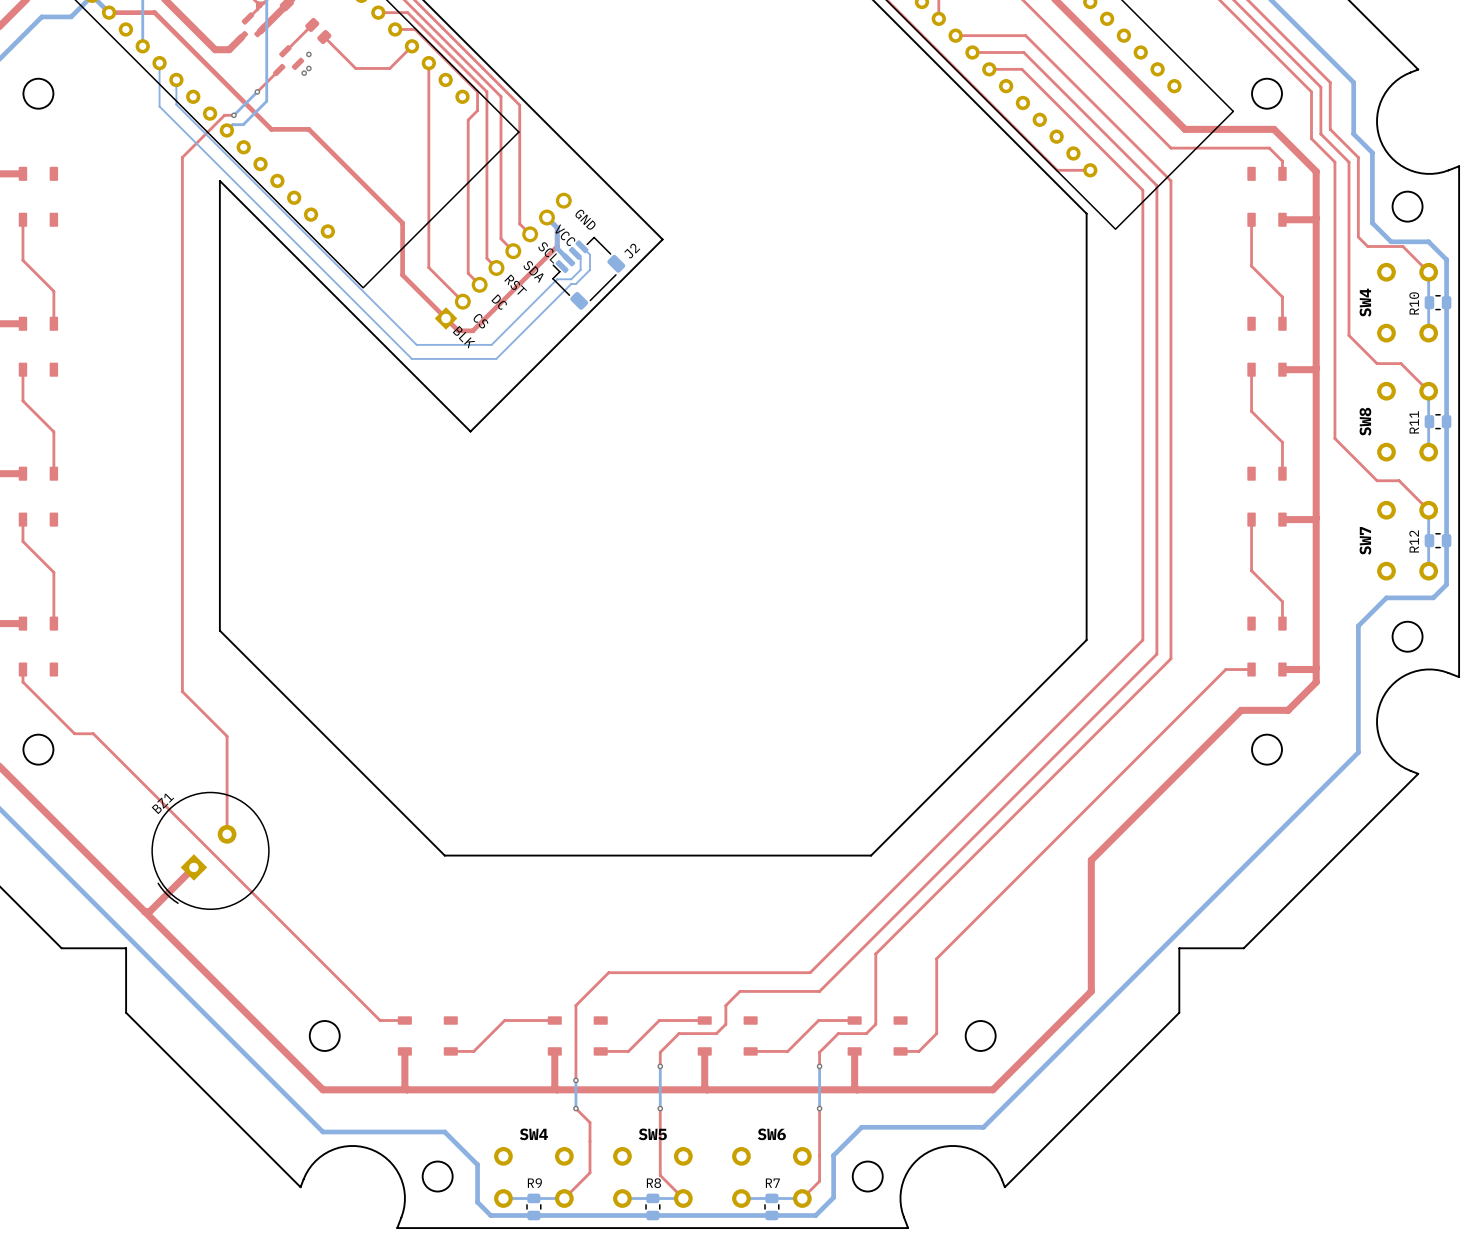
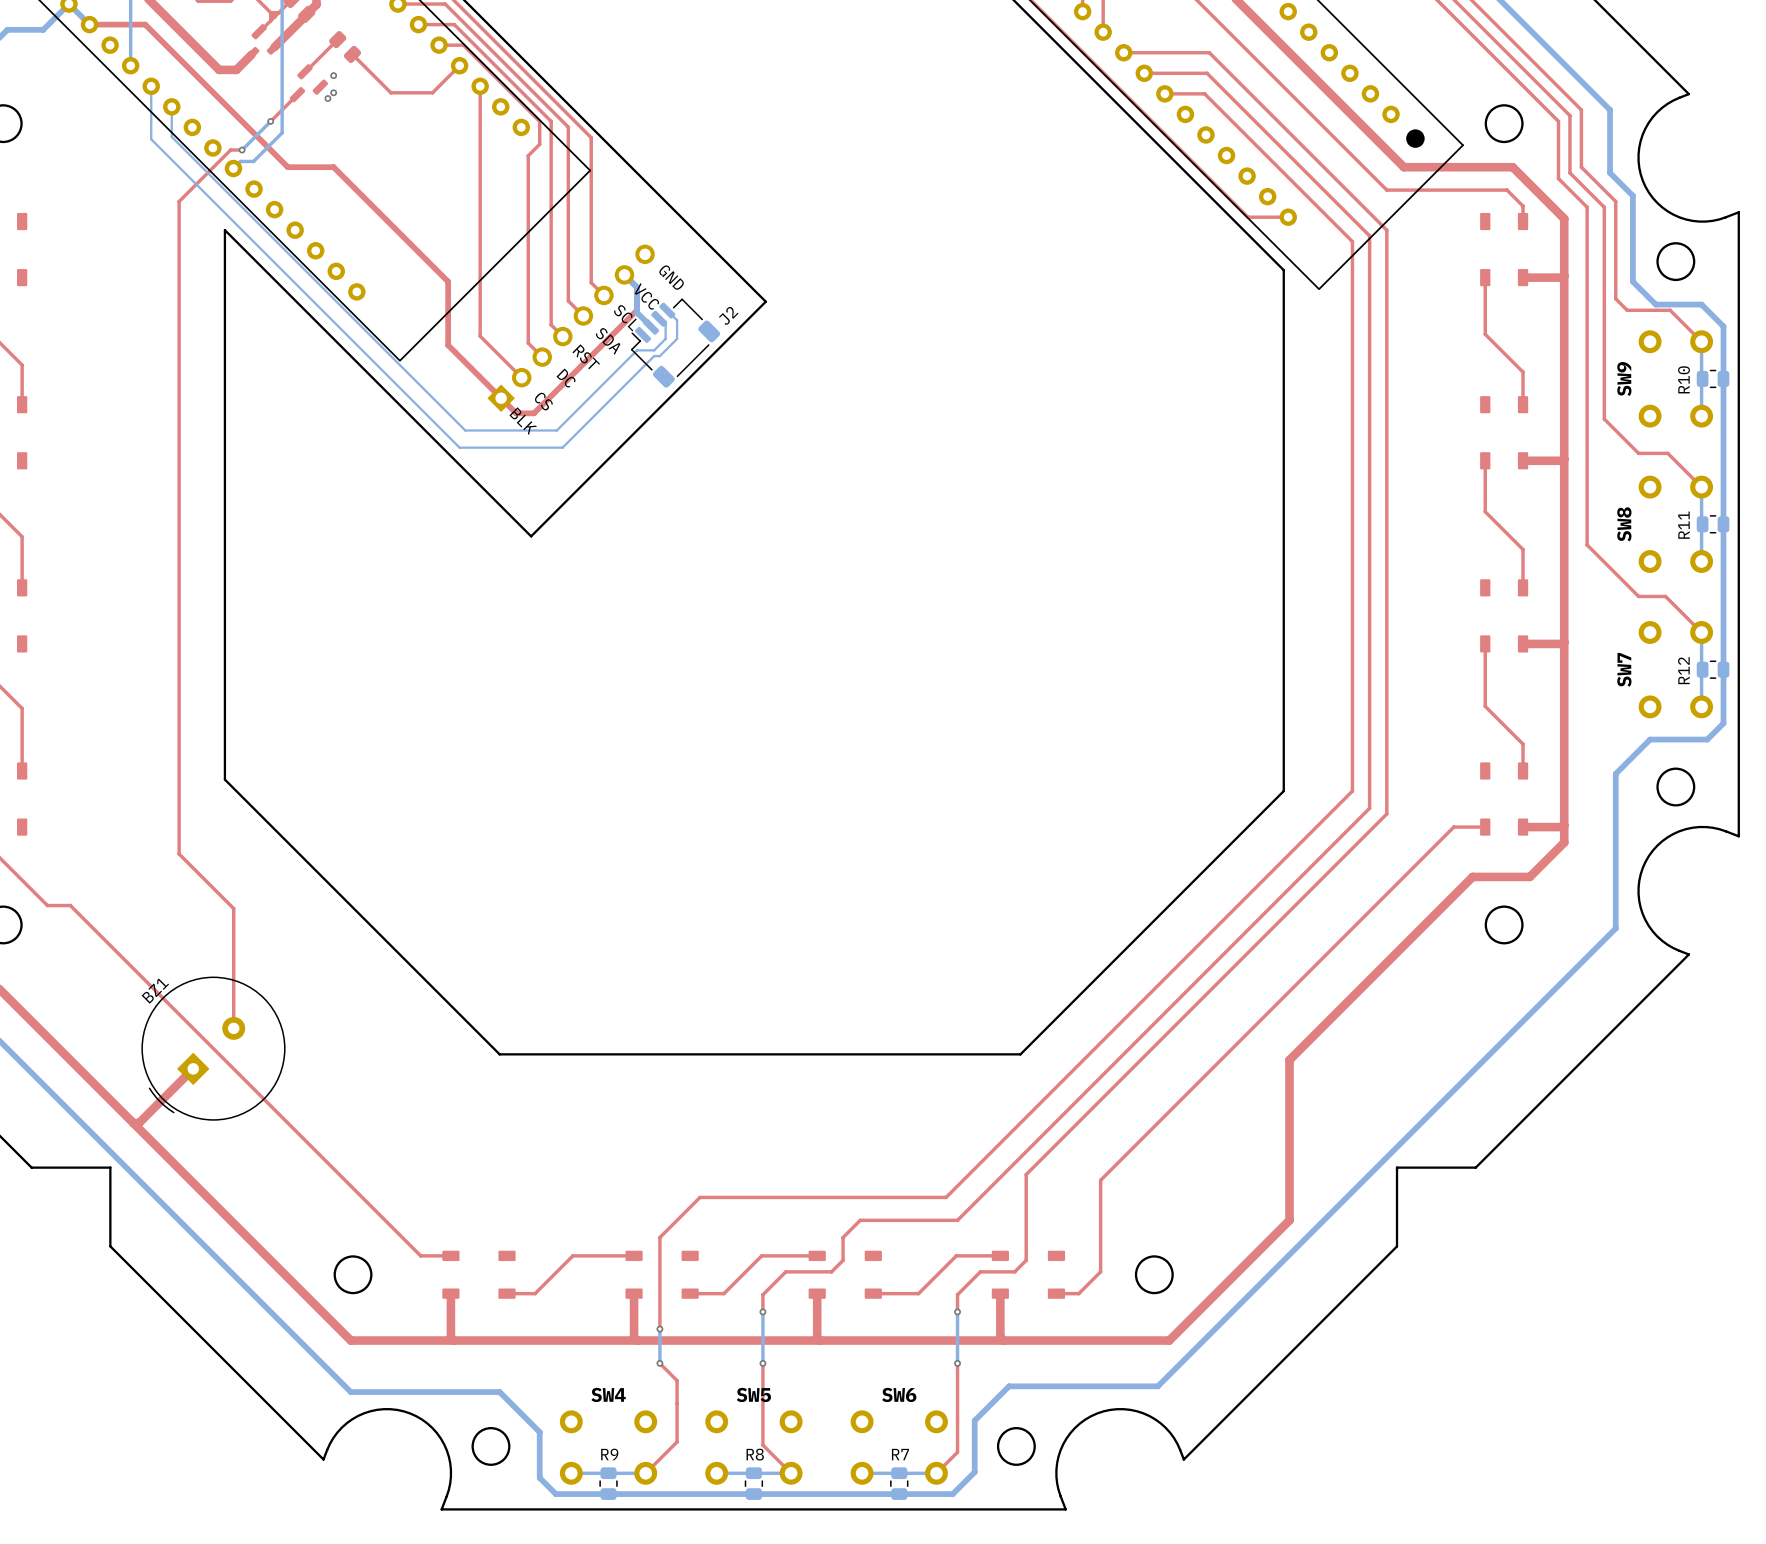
drawing: none -> [1406, 129, 1425, 148]
text: SW4 (1365, 302) -> SW9 (1624, 379)

